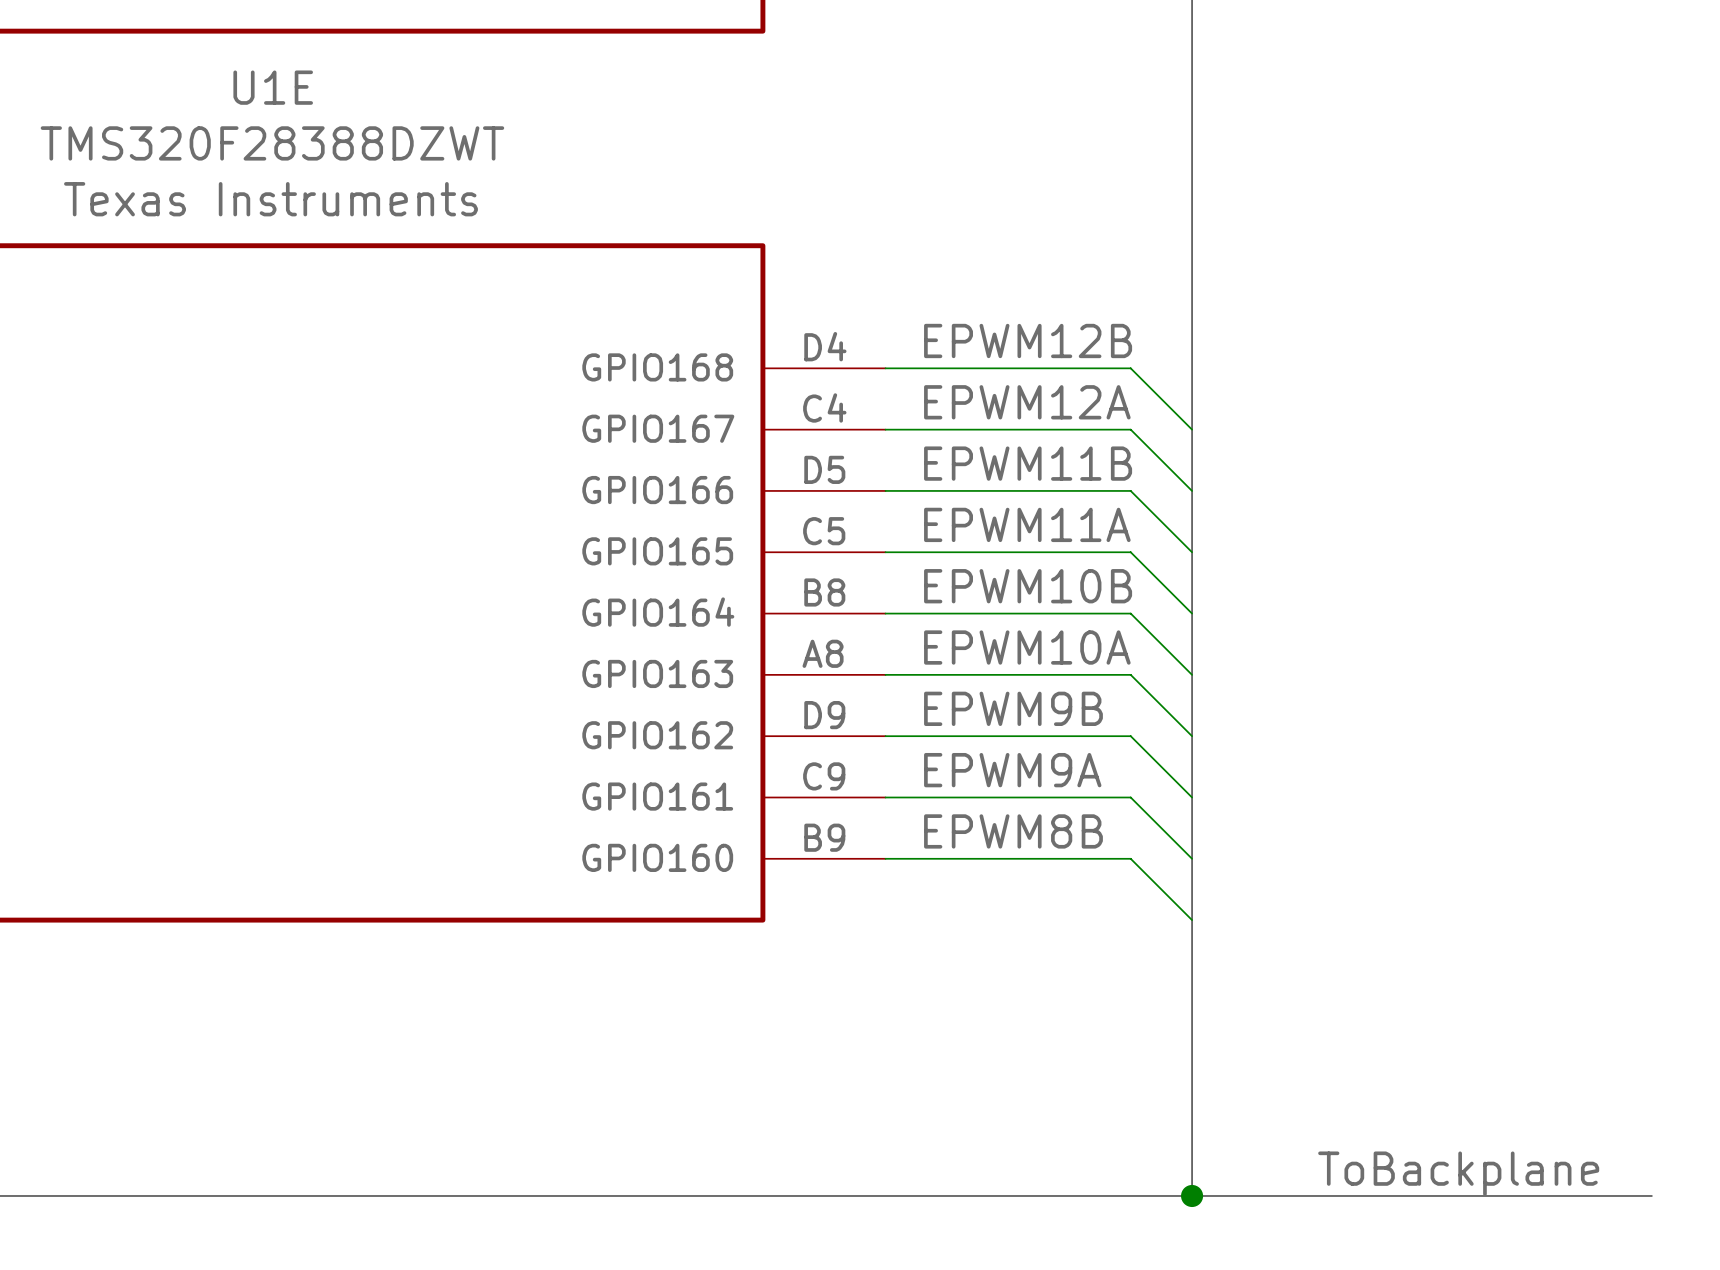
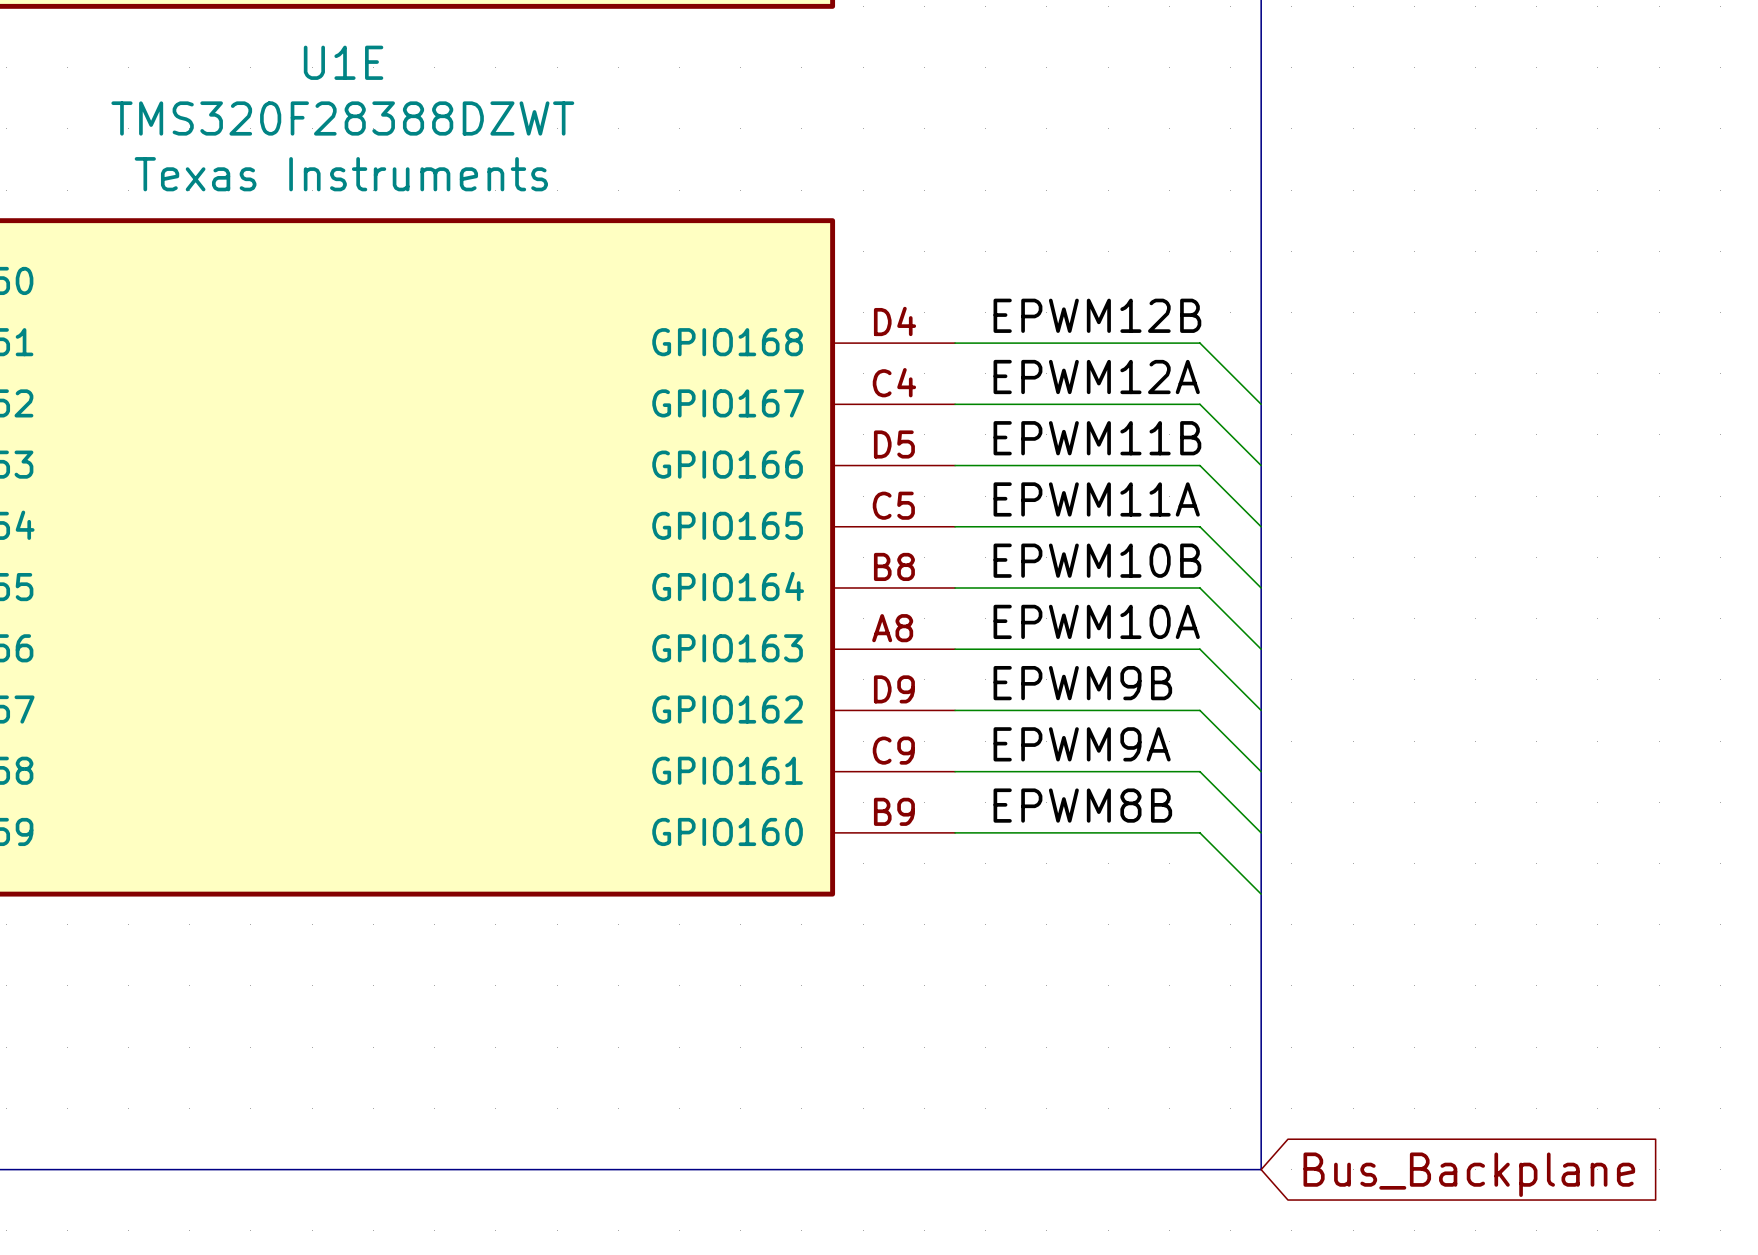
label: ToBackplane (1458, 1173) -> none
bus: (1192, 1195) (1651, 1195) -> none
junction: (1192, 1195) -> none
global label: none -> Bus_Backplane (1469, 1174)

